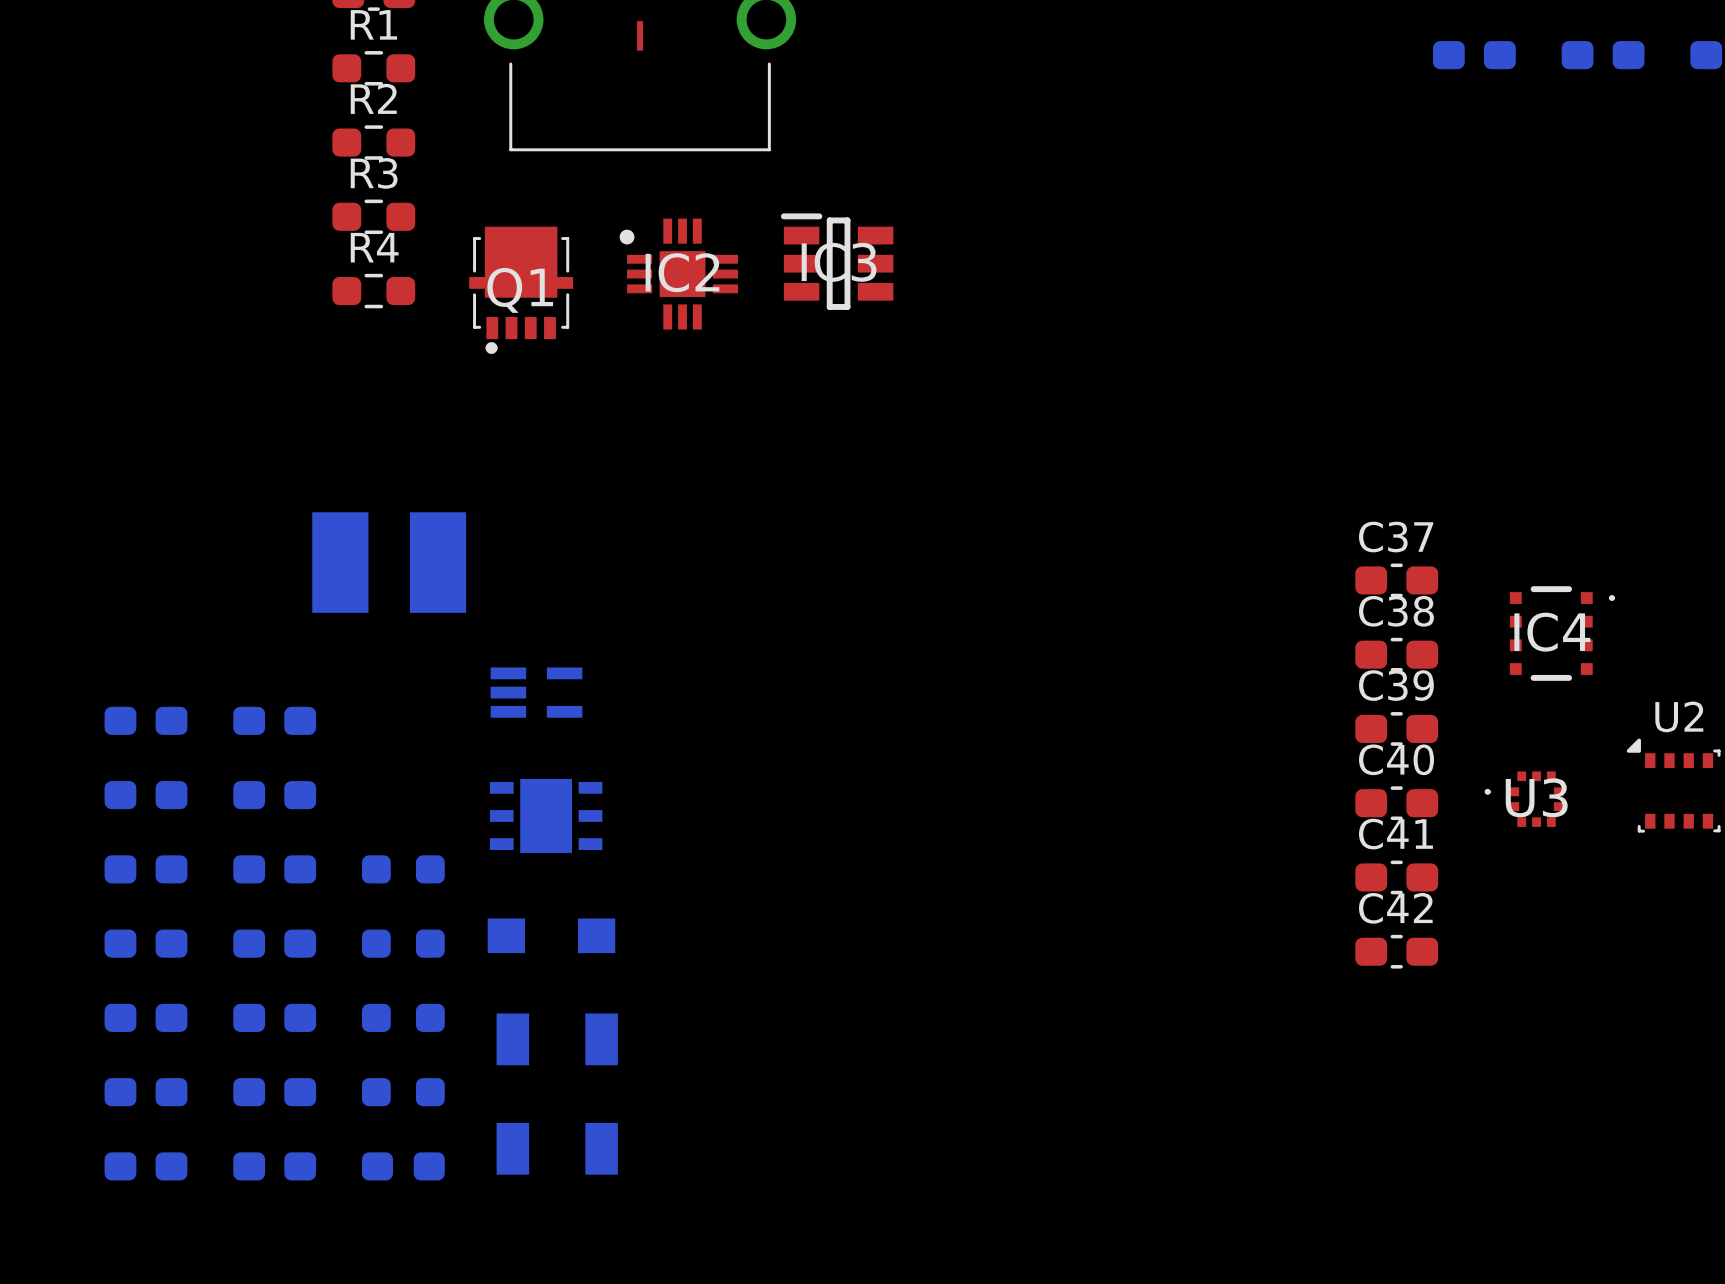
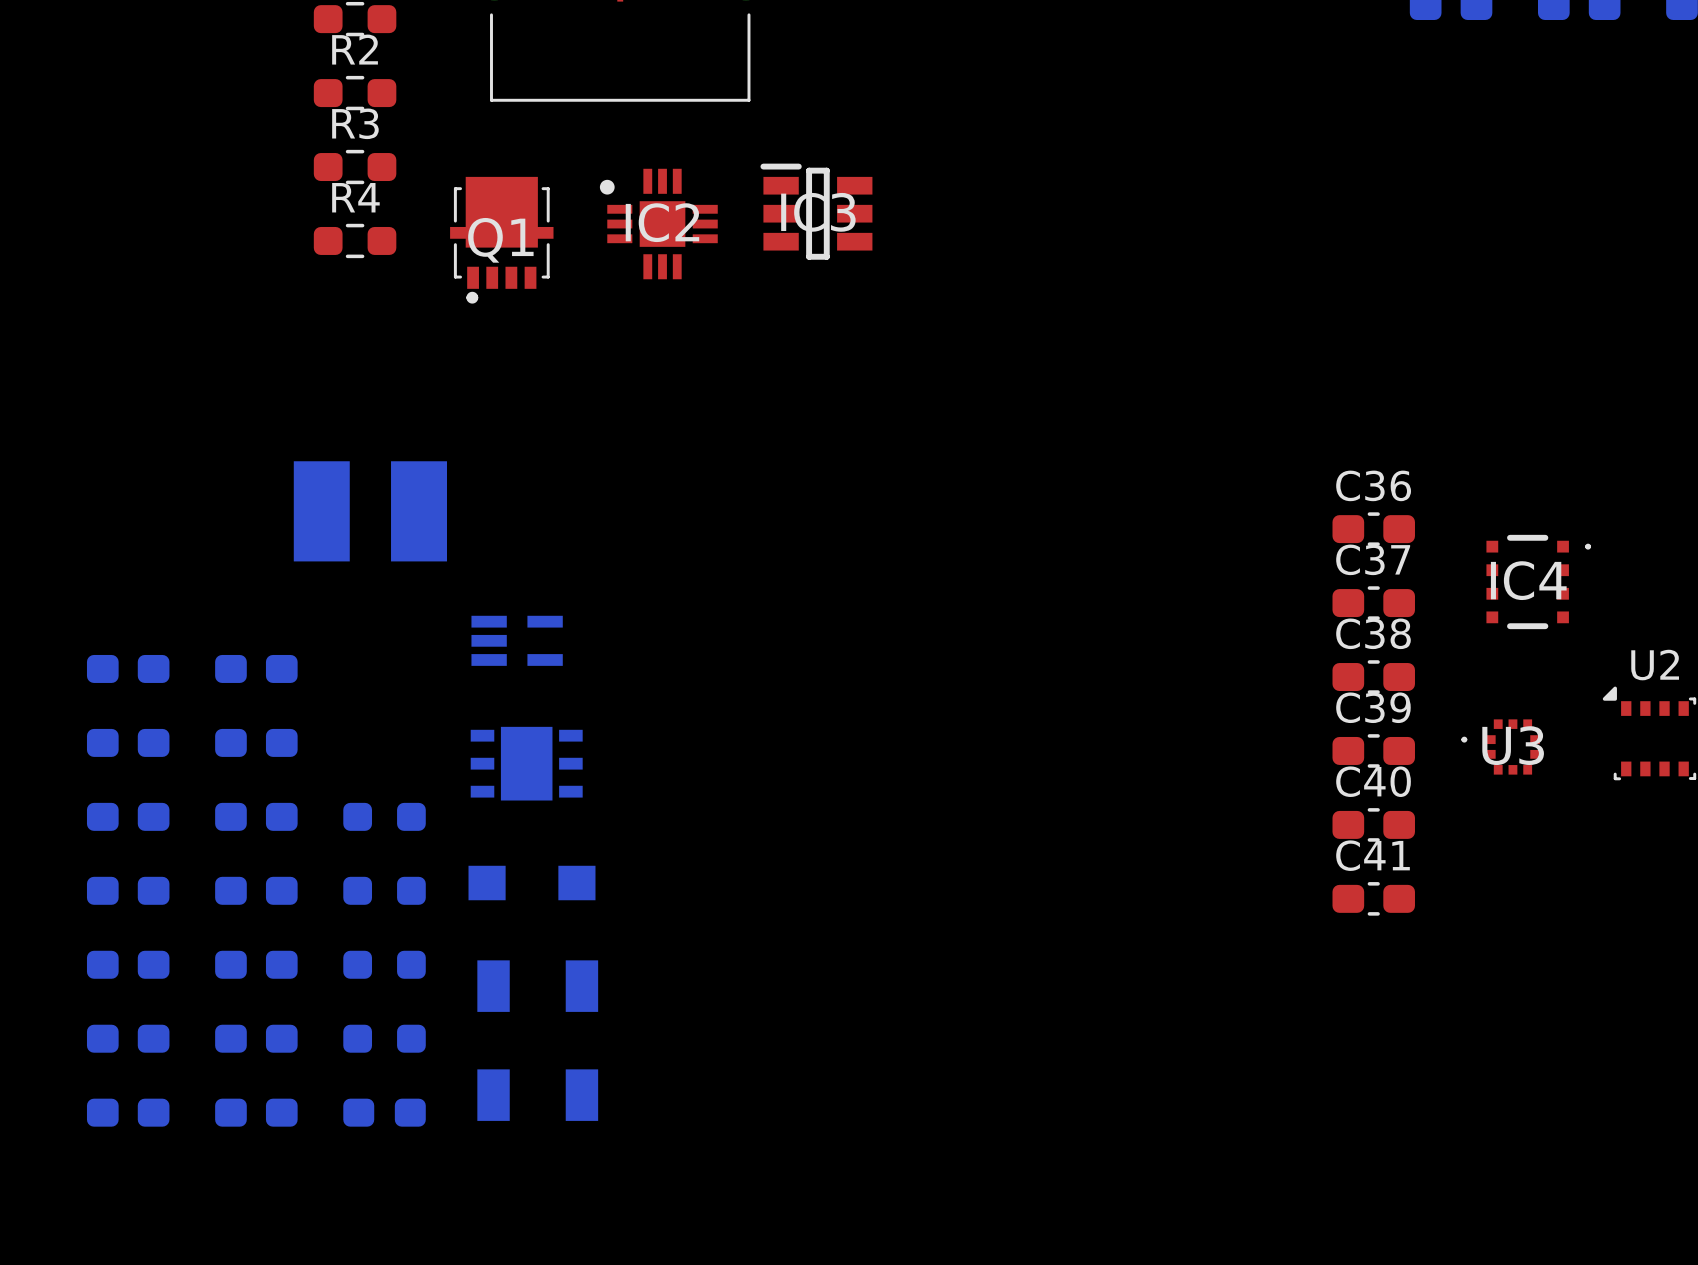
C37 name: C37 (1396, 537) -> C36 (1373, 485)
C38 name: C38 (1396, 611) -> C37 (1373, 559)
C39 name: C39 (1396, 685) -> C38 (1373, 633)
C40 name: C40 (1396, 759) -> C39 (1373, 707)
C41 name: C41 (1395, 834) -> C40 (1373, 781)
C42 name: C42 (1395, 908) -> C41 (1373, 855)

